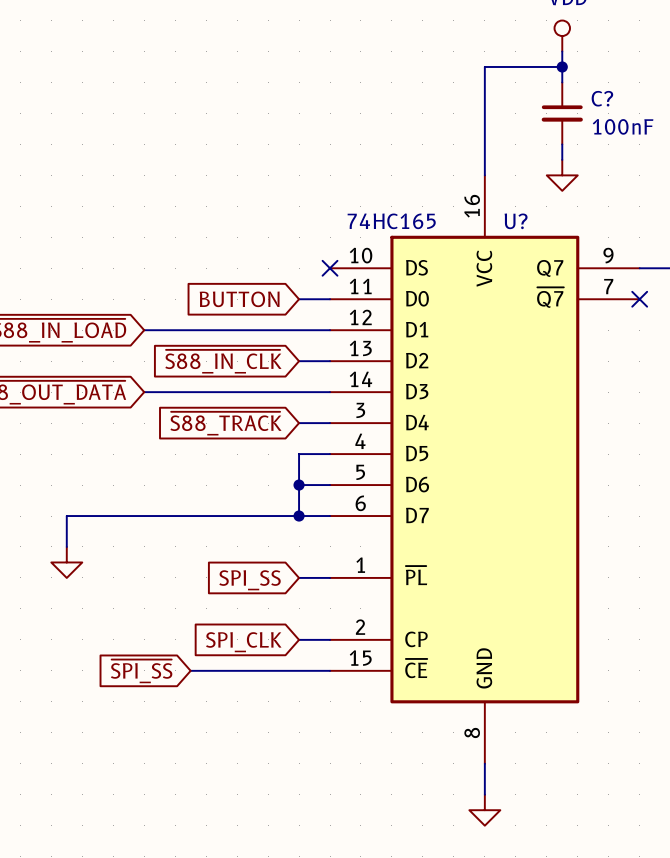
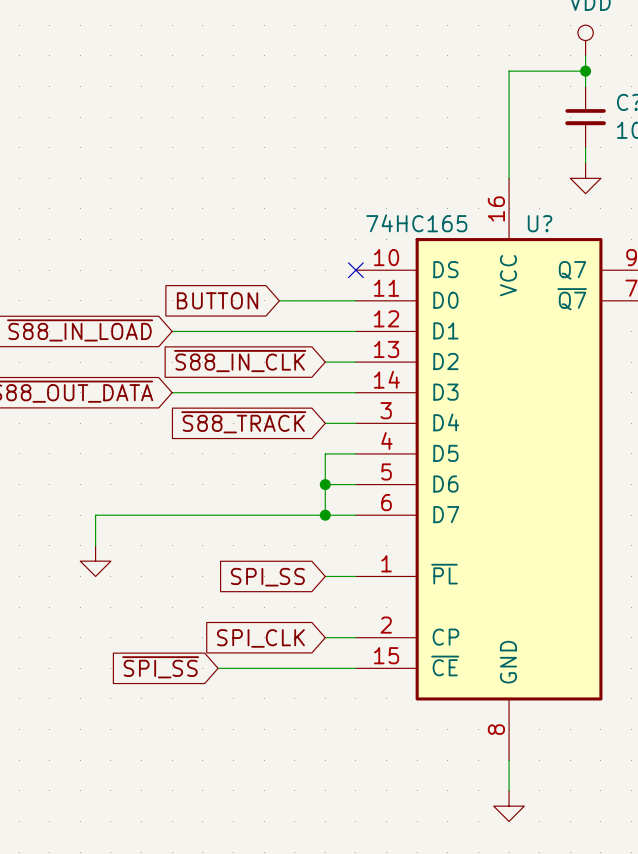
global label position: BUTTON (239, 299) -> BUTTON (217, 300)
wire: none -> (279, 300) (325, 300)

